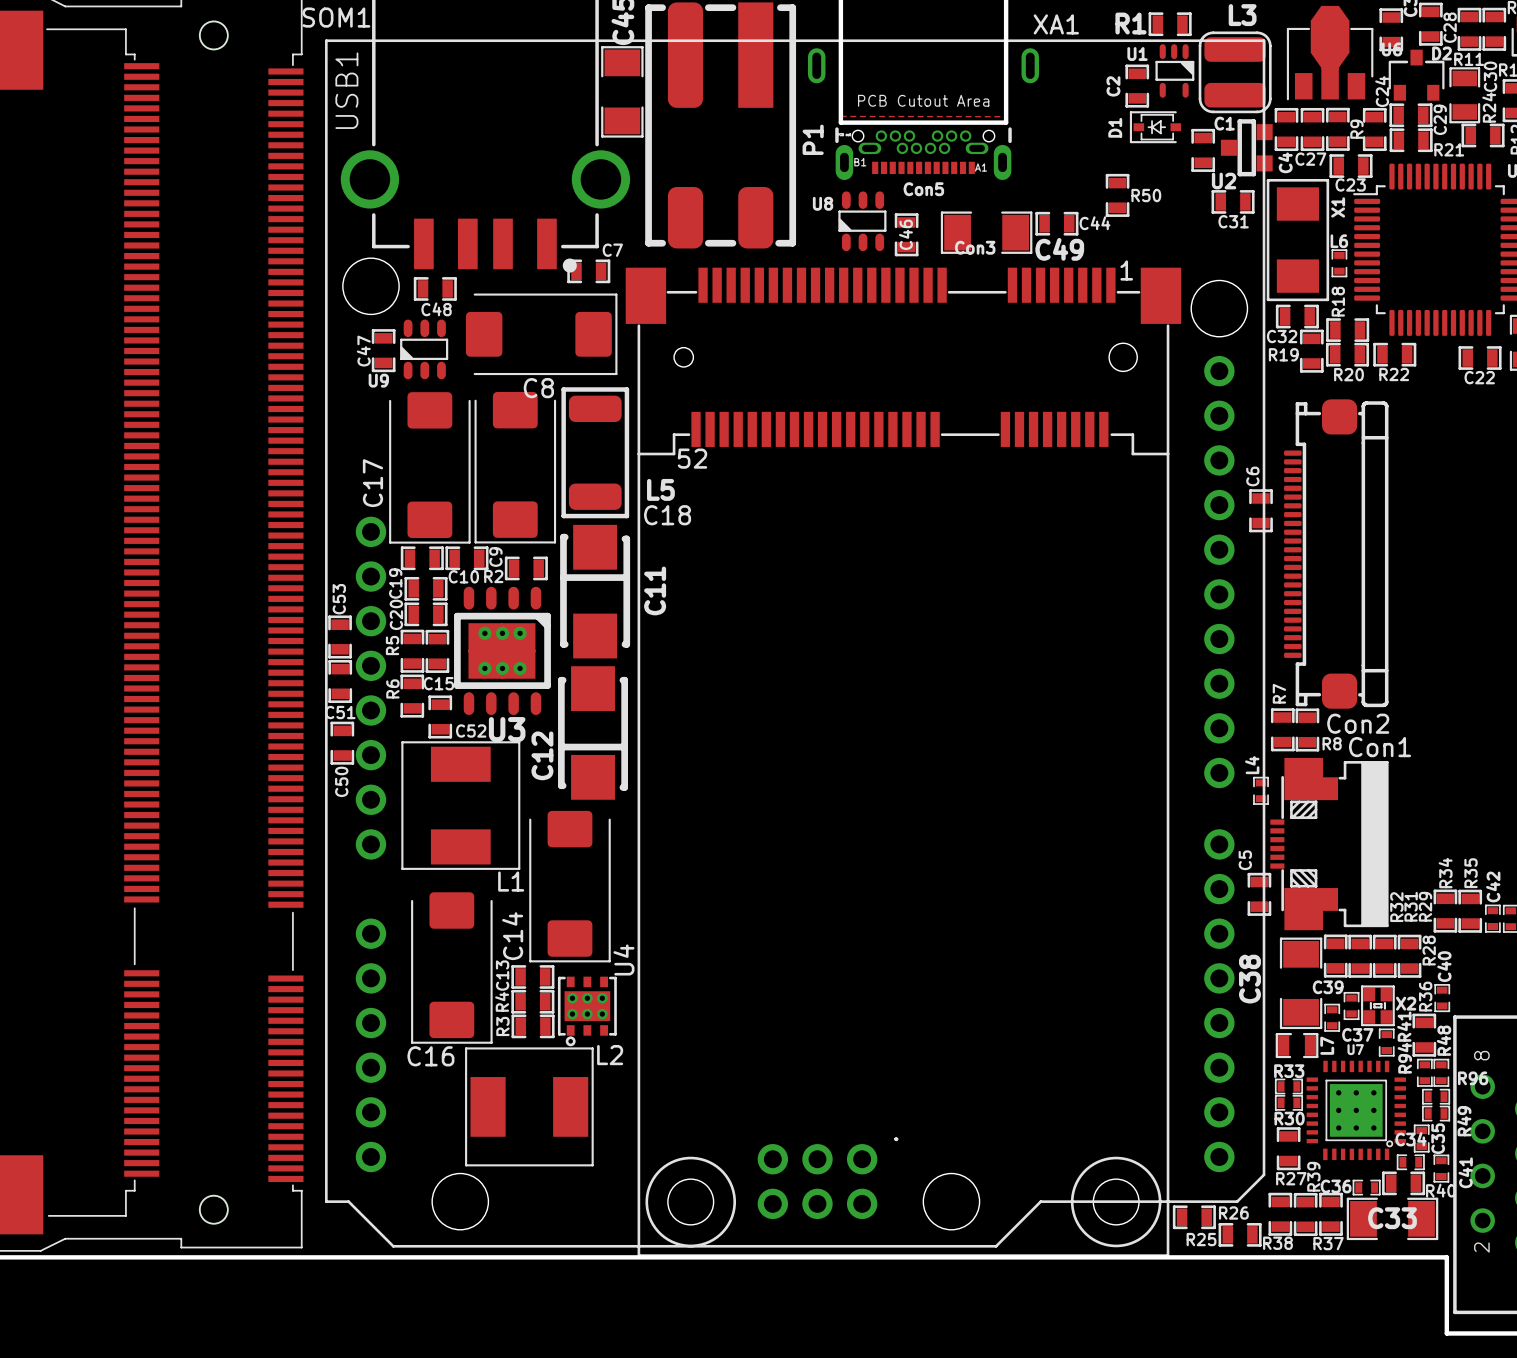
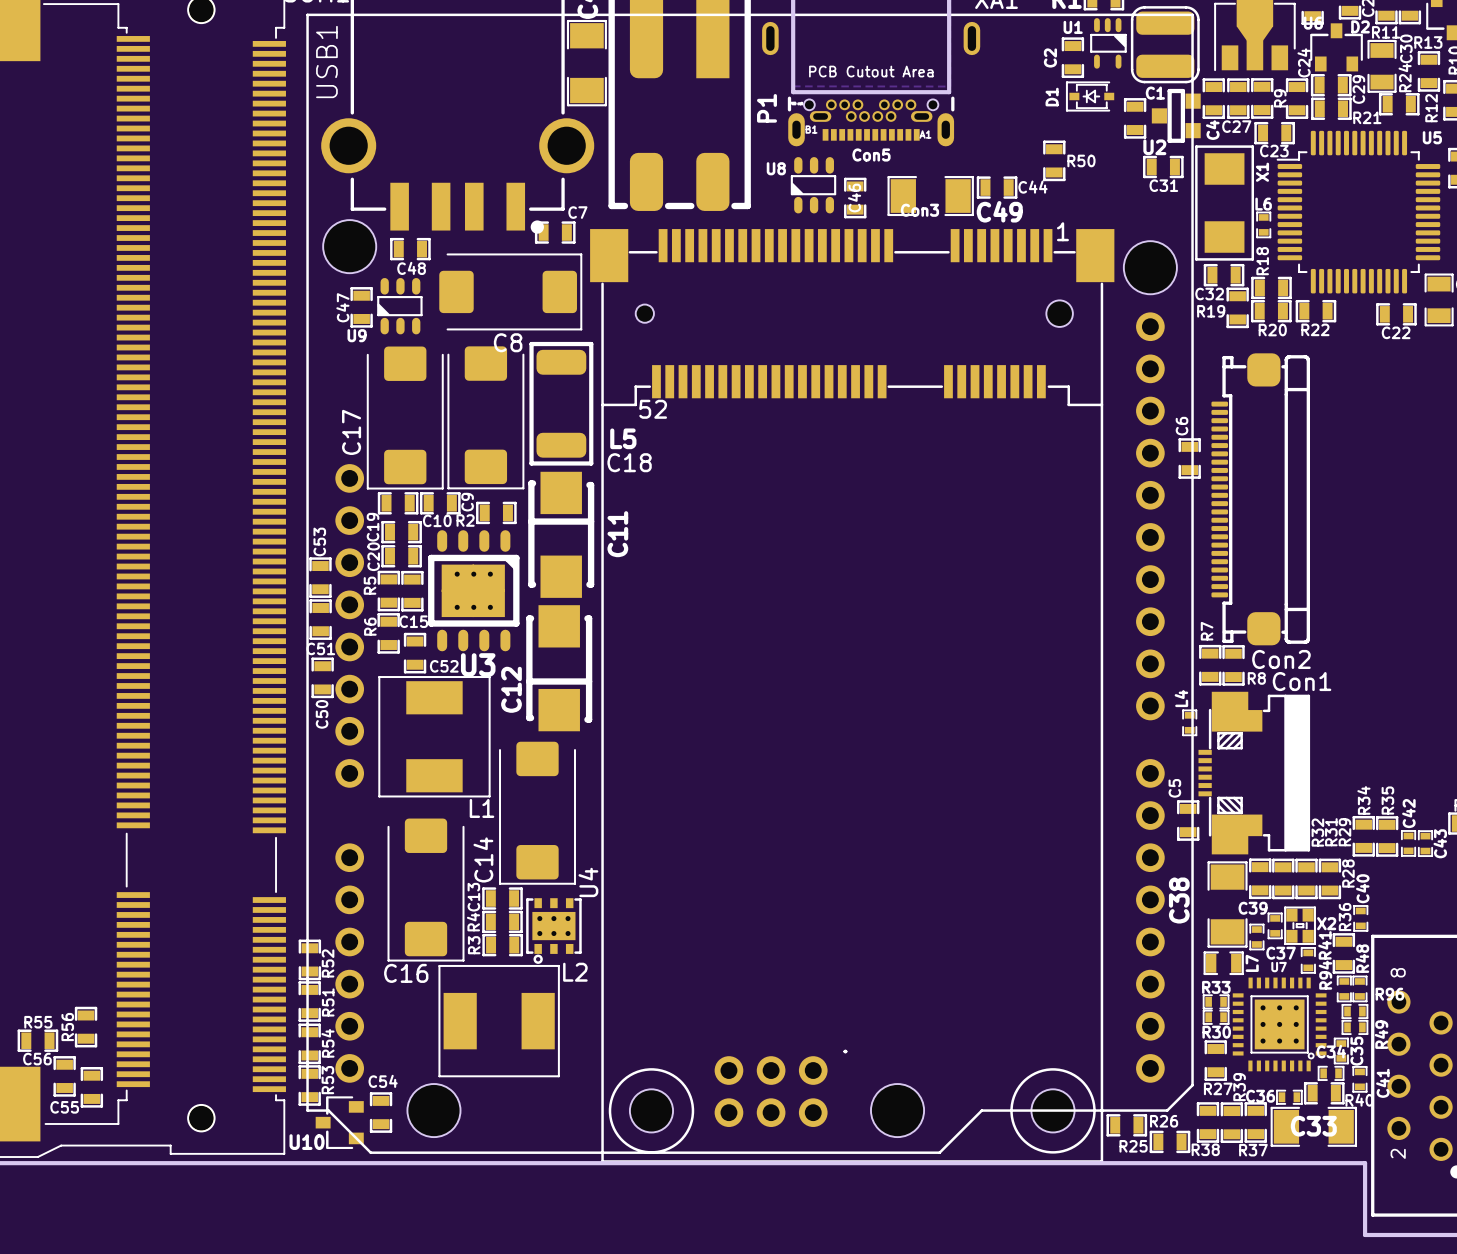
R52: none -> (309, 959)
R51: none -> (309, 1001)
R56: none -> (86, 1027)
R55: none -> (37, 1040)
R54: none -> (309, 1043)
C56: none -> (64, 1076)
R53: none -> (309, 1085)
C55: none -> (91, 1087)
C54: none -> (381, 1112)
U10: none -> (339, 1122)

